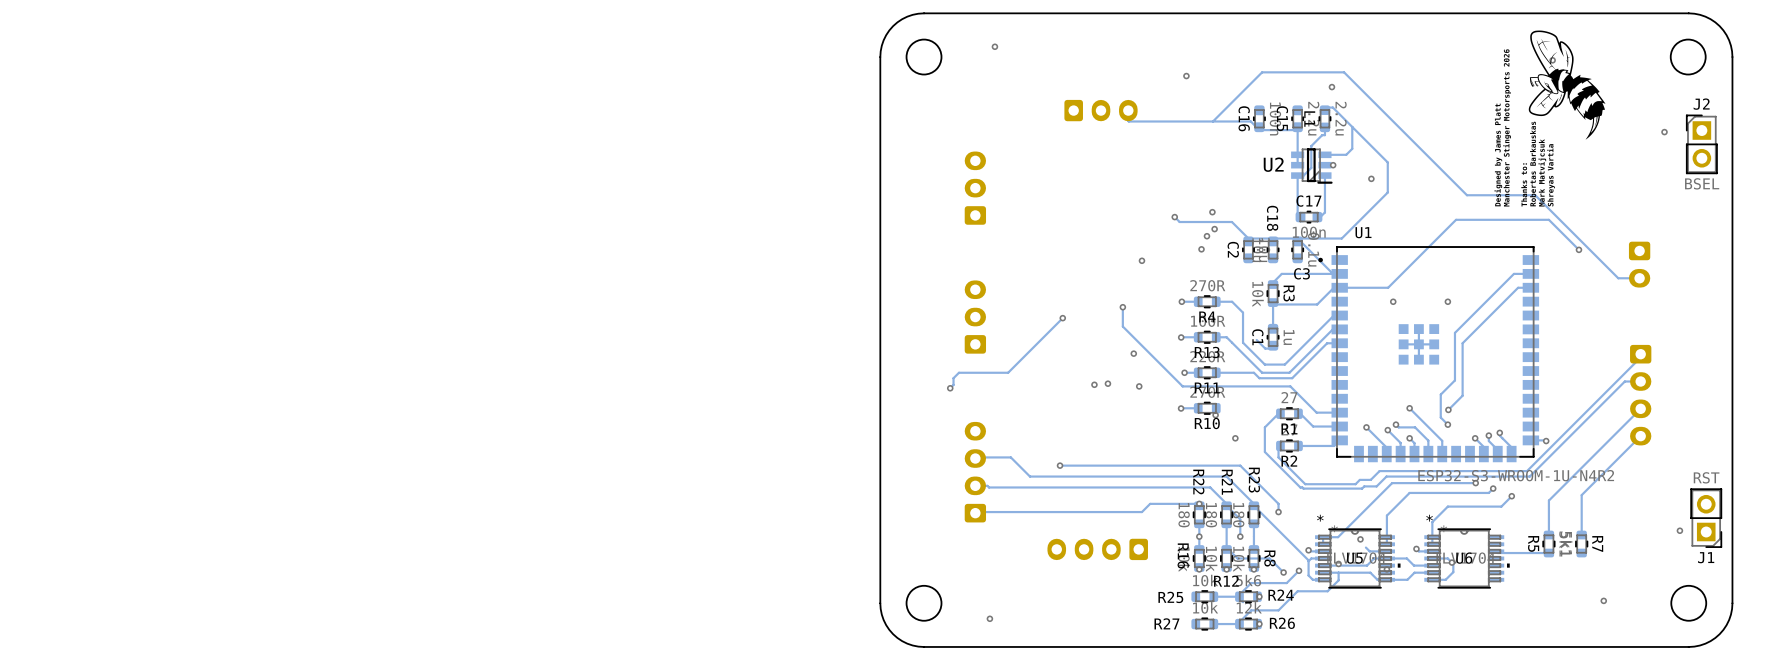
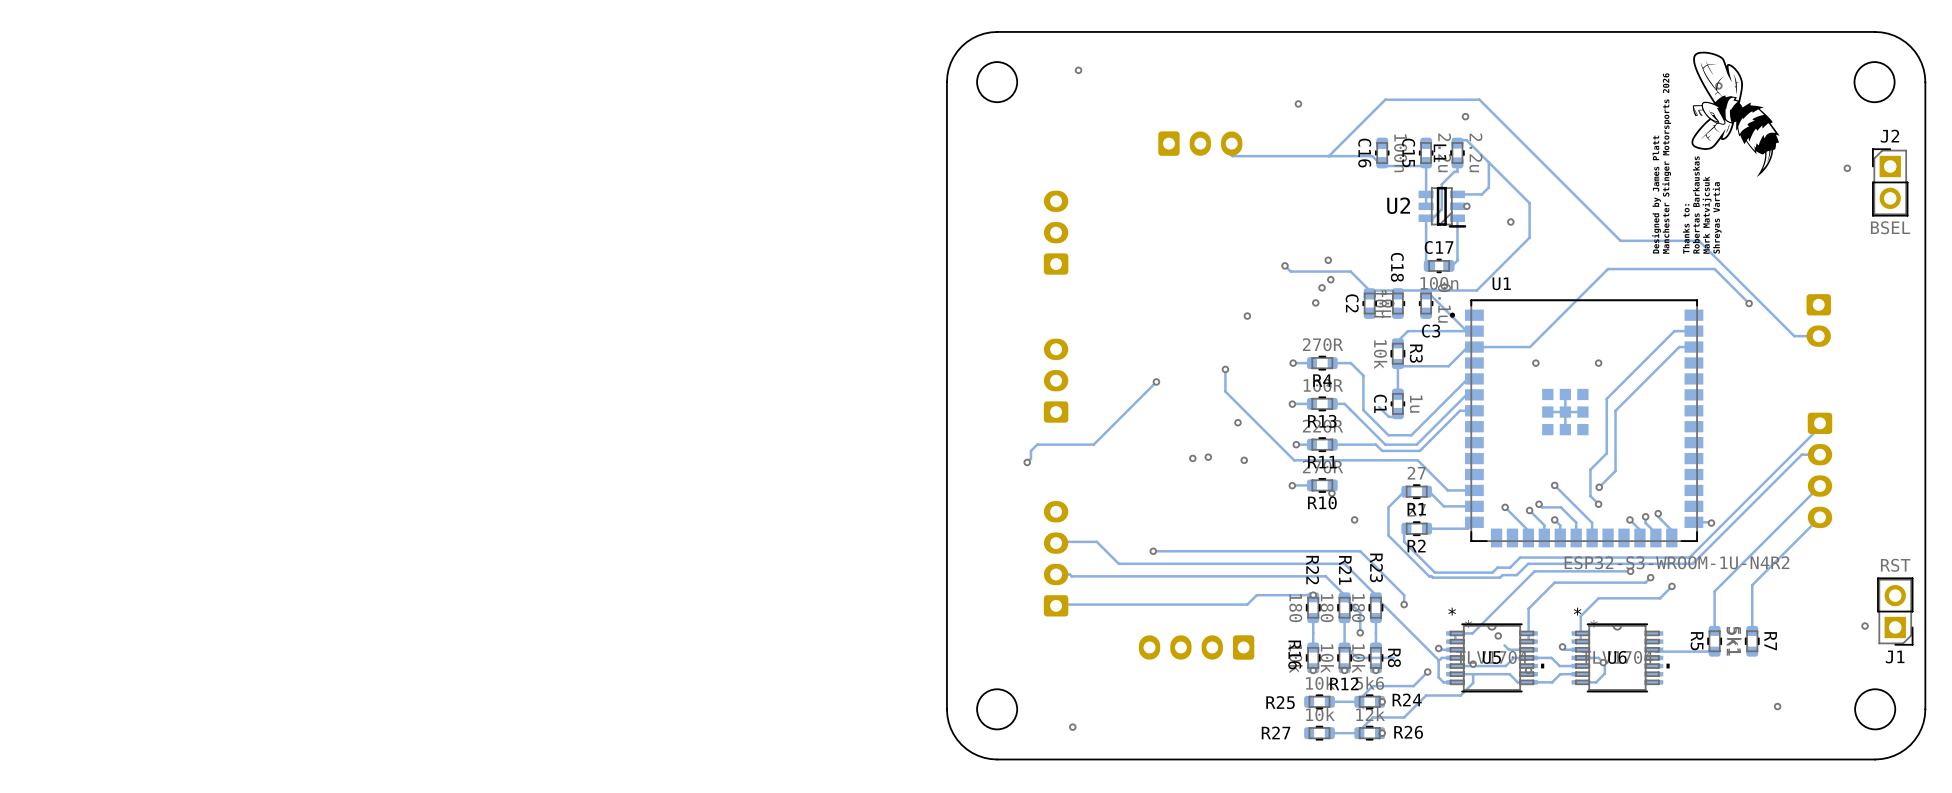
via: (1199, 536) -> none
track: (1269, 558) (1283, 572) -> none
via: (1283, 572) -> none

